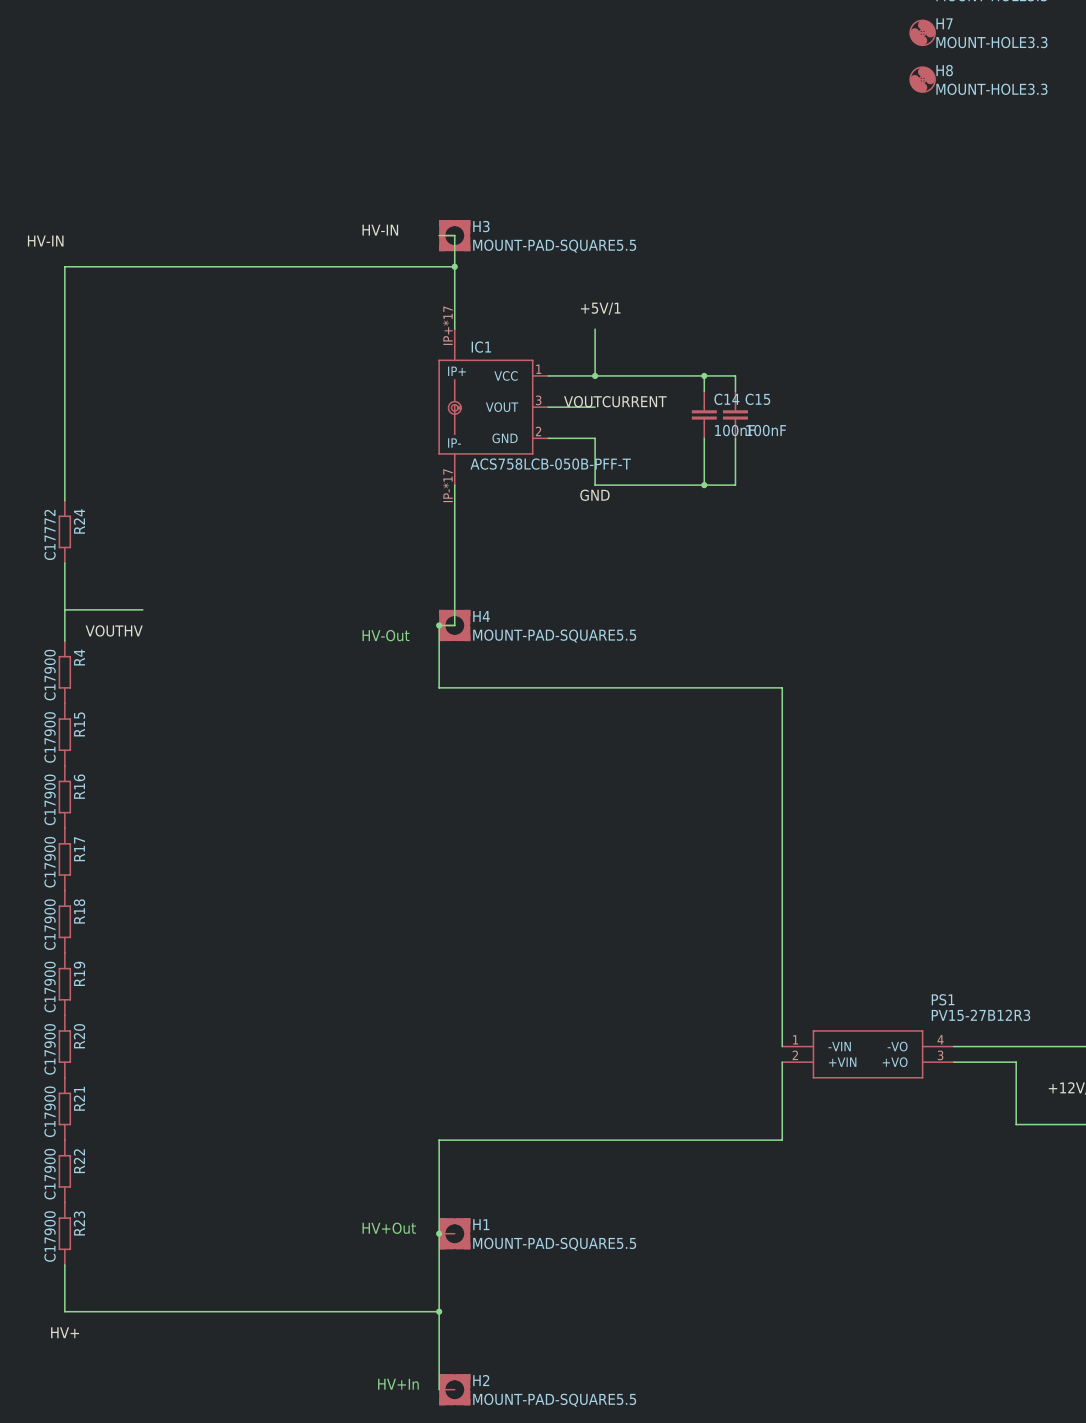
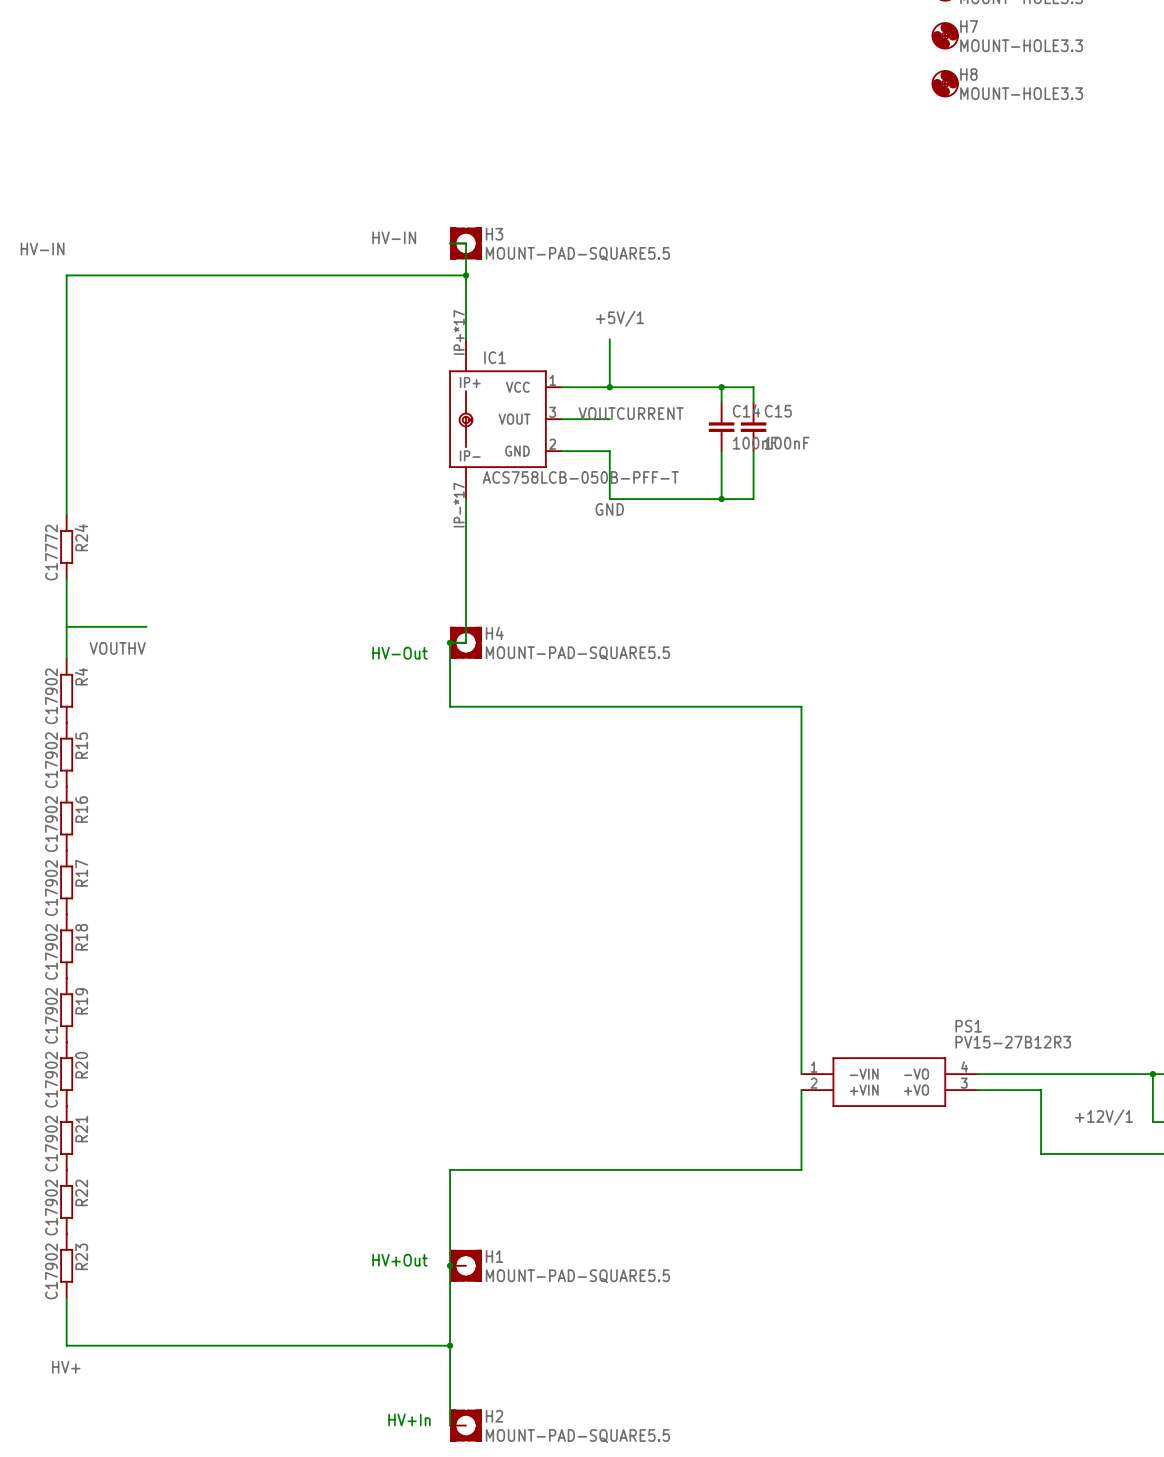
R4 value: C17900 (50, 675) -> C17902 (51, 696)
R15 value: C17900 (50, 737) -> C17902 (51, 760)
R16 value: C17900 (50, 799) -> C17902 (51, 824)
R17 value: C17900 (50, 862) -> C17902 (51, 888)
R18 value: C17900 (50, 924) -> C17902 (51, 951)
R19 value: C17900 (50, 987) -> C17902 (51, 1015)
R20 value: C17900 (50, 1049) -> C17902 (51, 1079)
R21 value: C17900 (50, 1111) -> C17902 (51, 1143)
R22 value: C17900 (50, 1174) -> C17902 (51, 1207)
R23 value: C17900 (50, 1236) -> C17902 (51, 1271)

